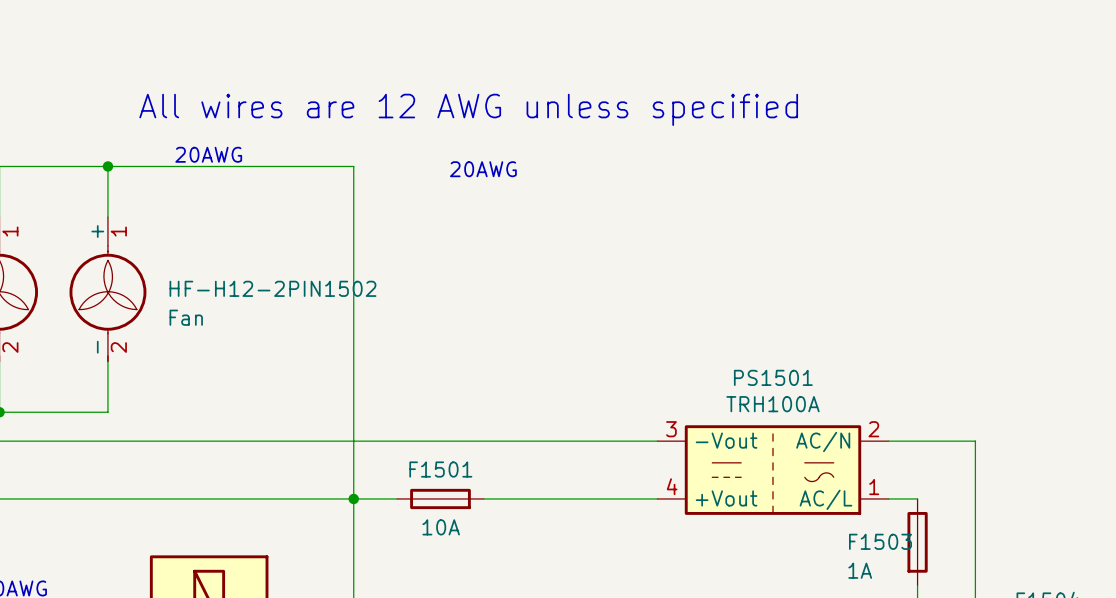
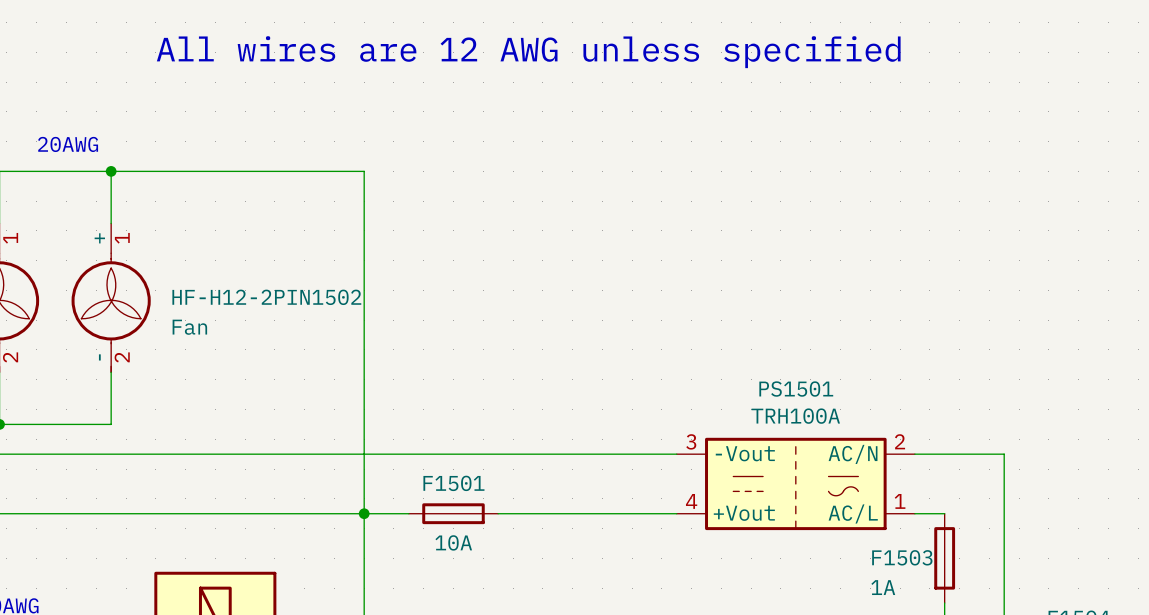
text position: All wires are 12 AWG unless specified (468, 109) -> All wires are 12 AWG unless specified (528, 52)
text position: 20AWG (208, 154) -> 20AWG (68, 144)
text: 20AWG (483, 169) -> none

